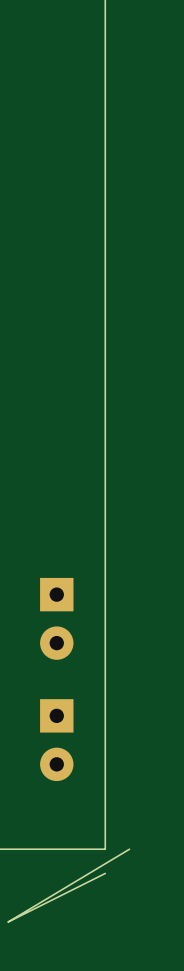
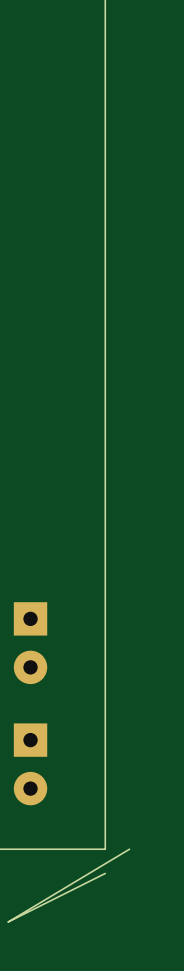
part position: (56, 618) -> (30, 643)
part position: (56, 740) -> (30, 764)

